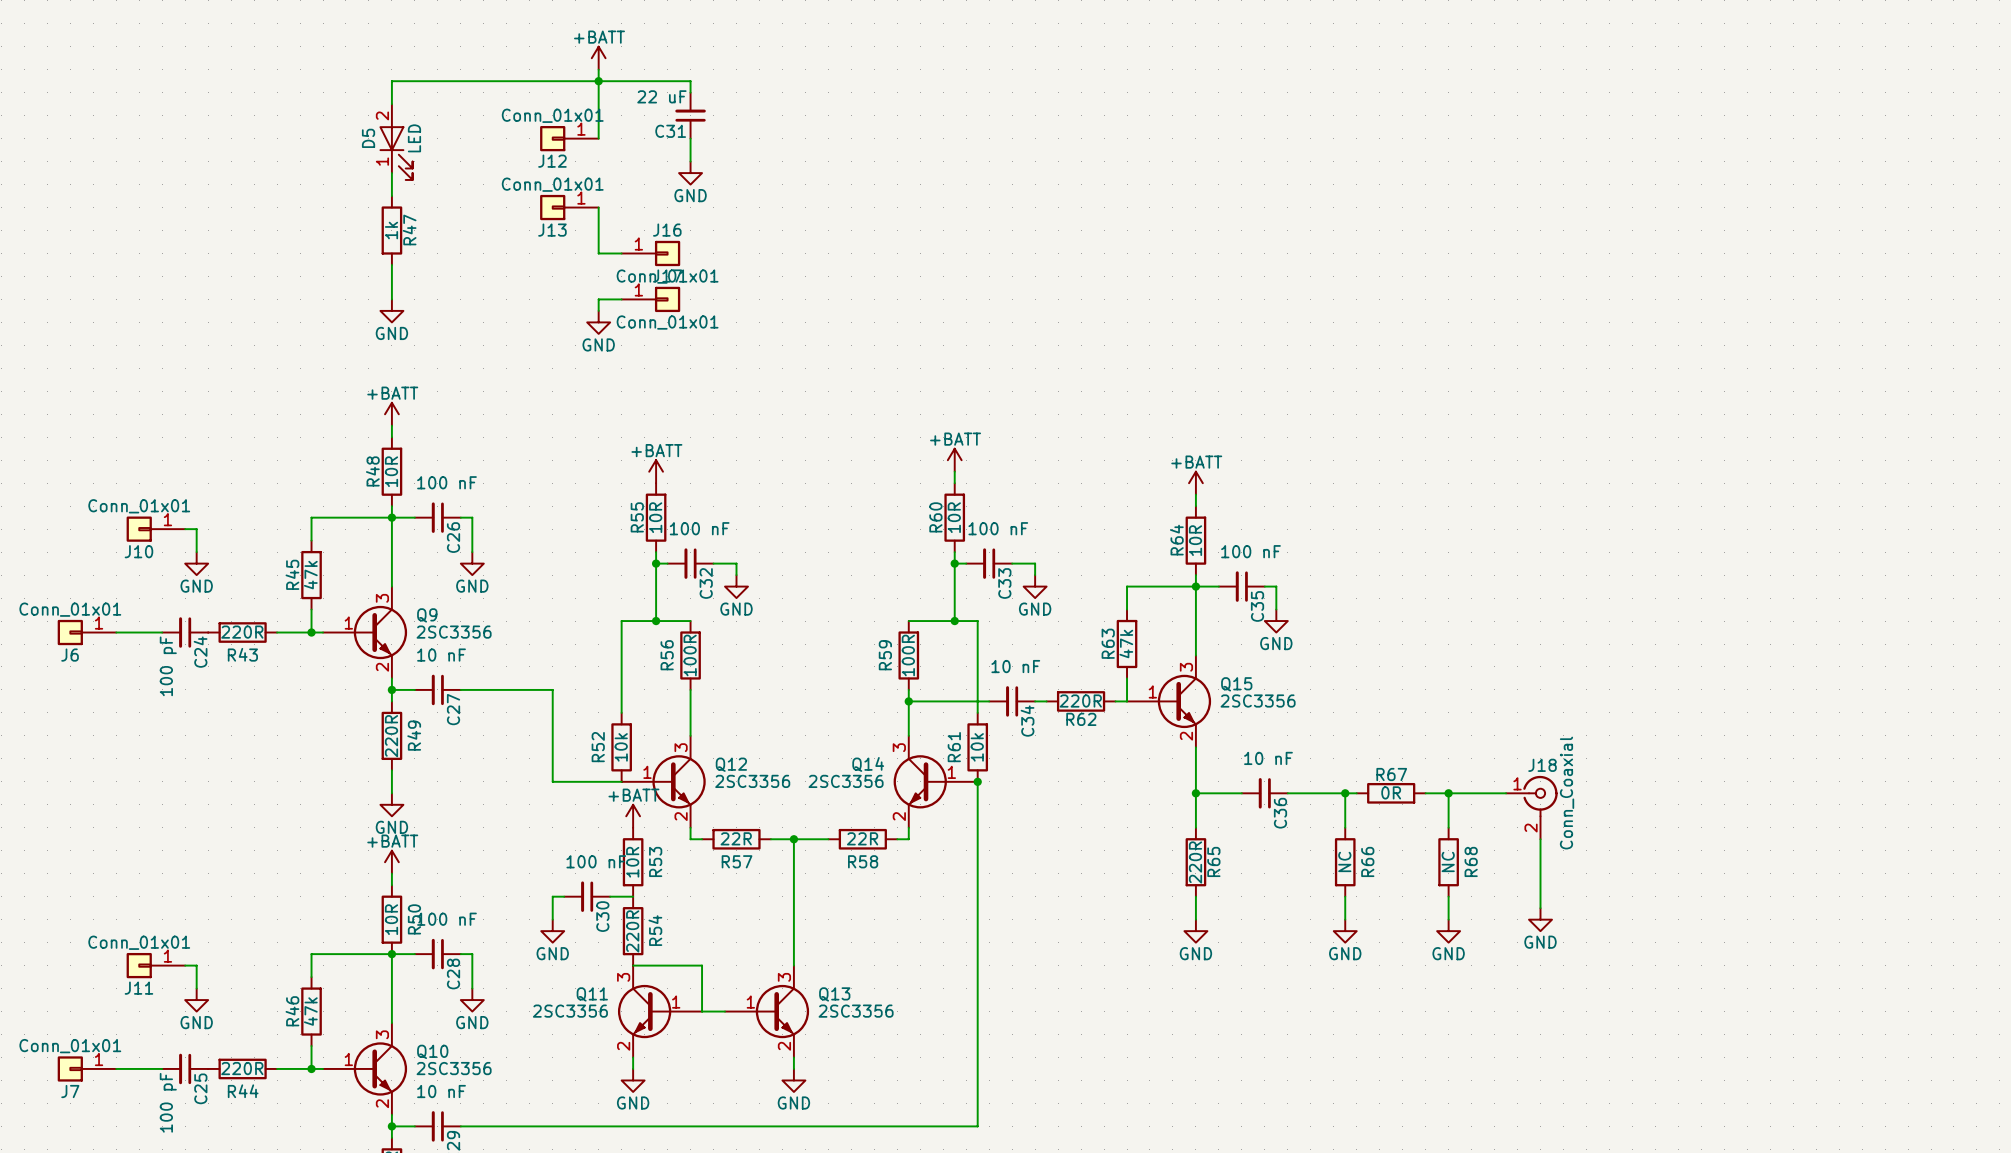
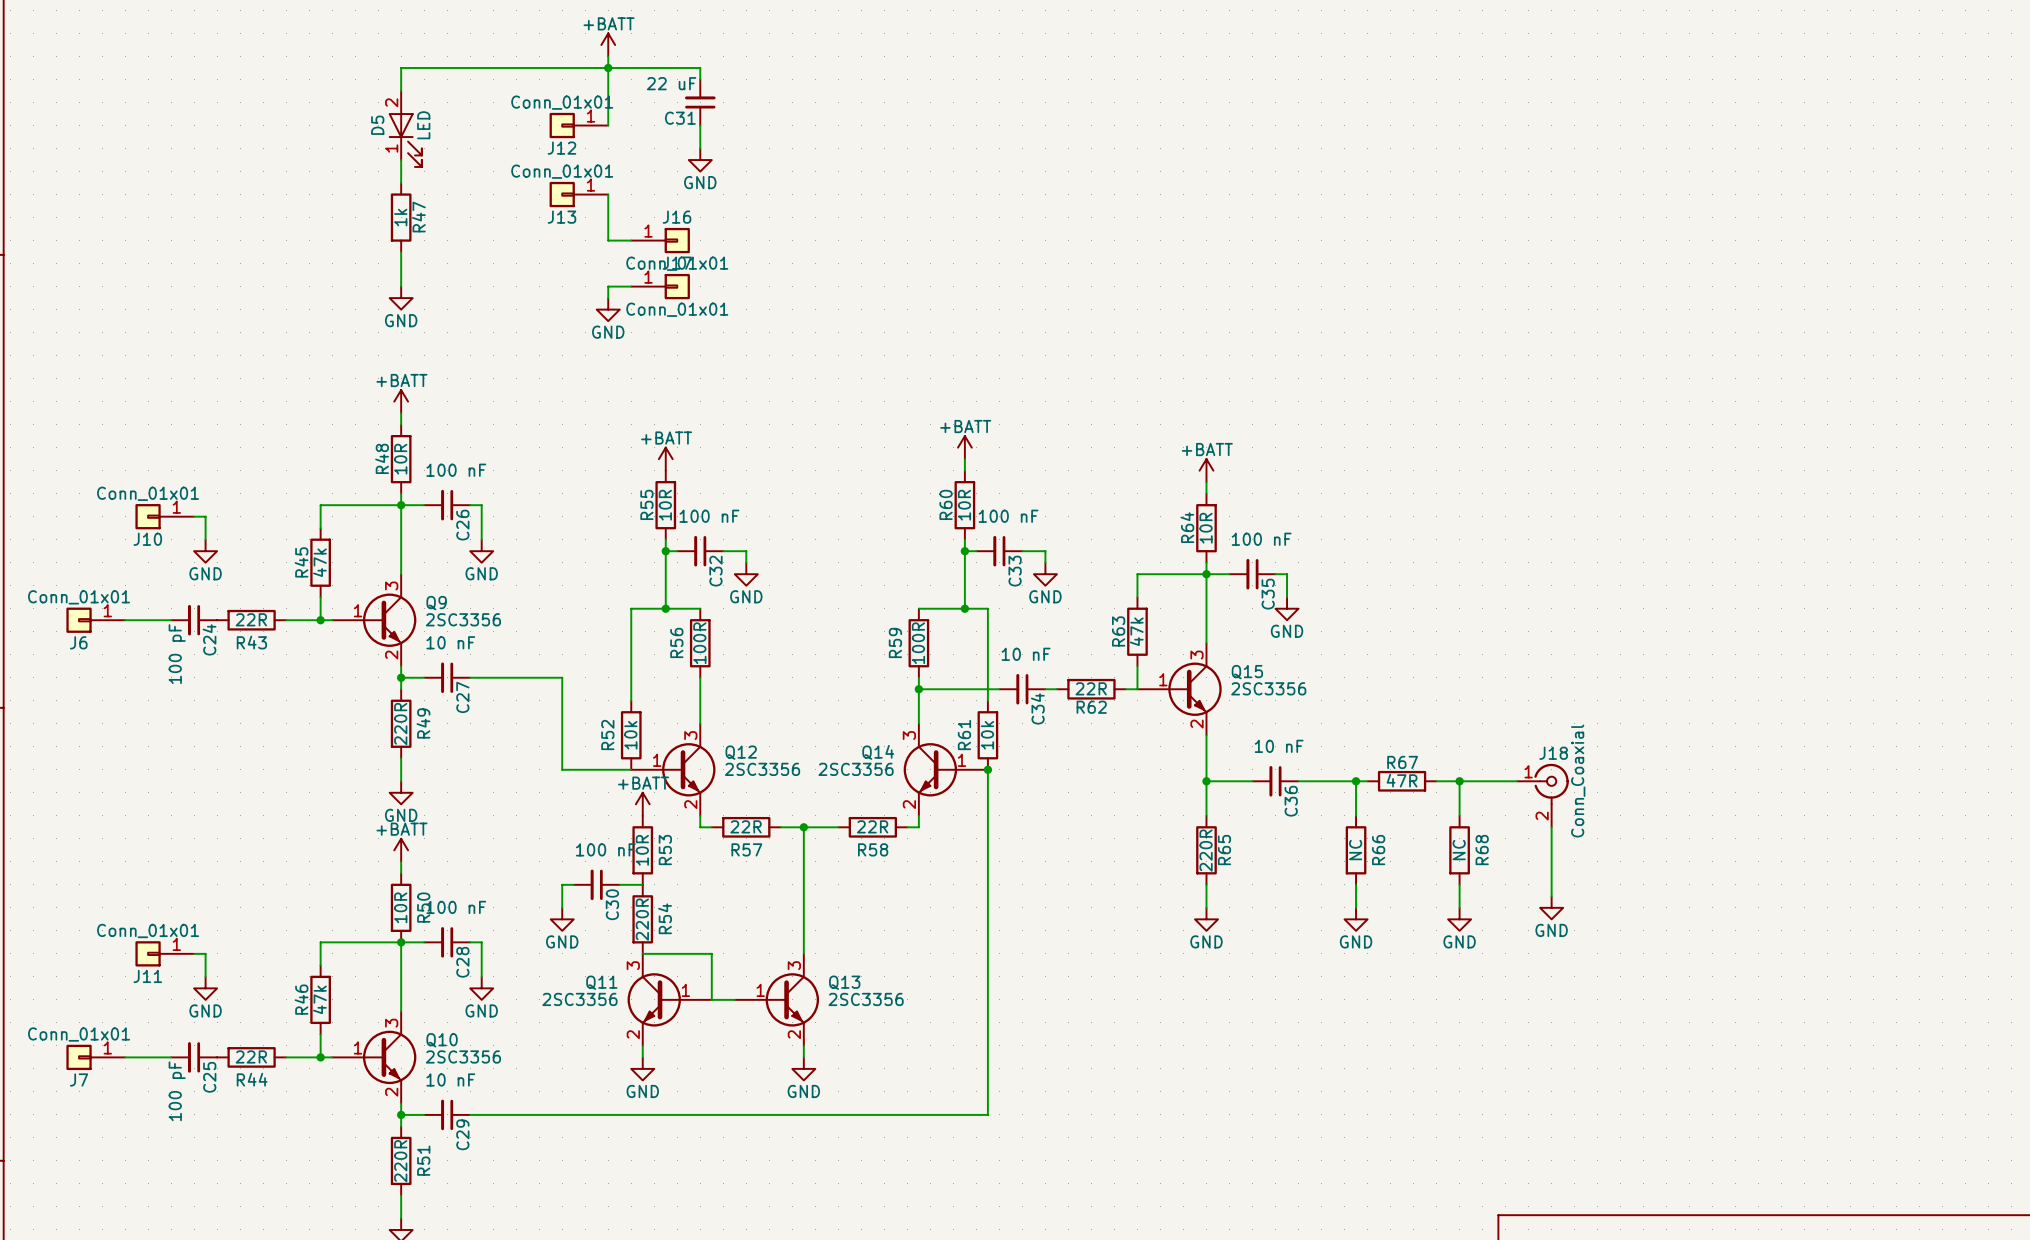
R43 value: 220R (242, 632) -> 22R (251, 619)
R62 value: 220R (1080, 701) -> 22R (1091, 688)
R67 value: 0R (1391, 792) -> 47R (1402, 780)
R44 value: 220R (242, 1068) -> 22R (251, 1056)

